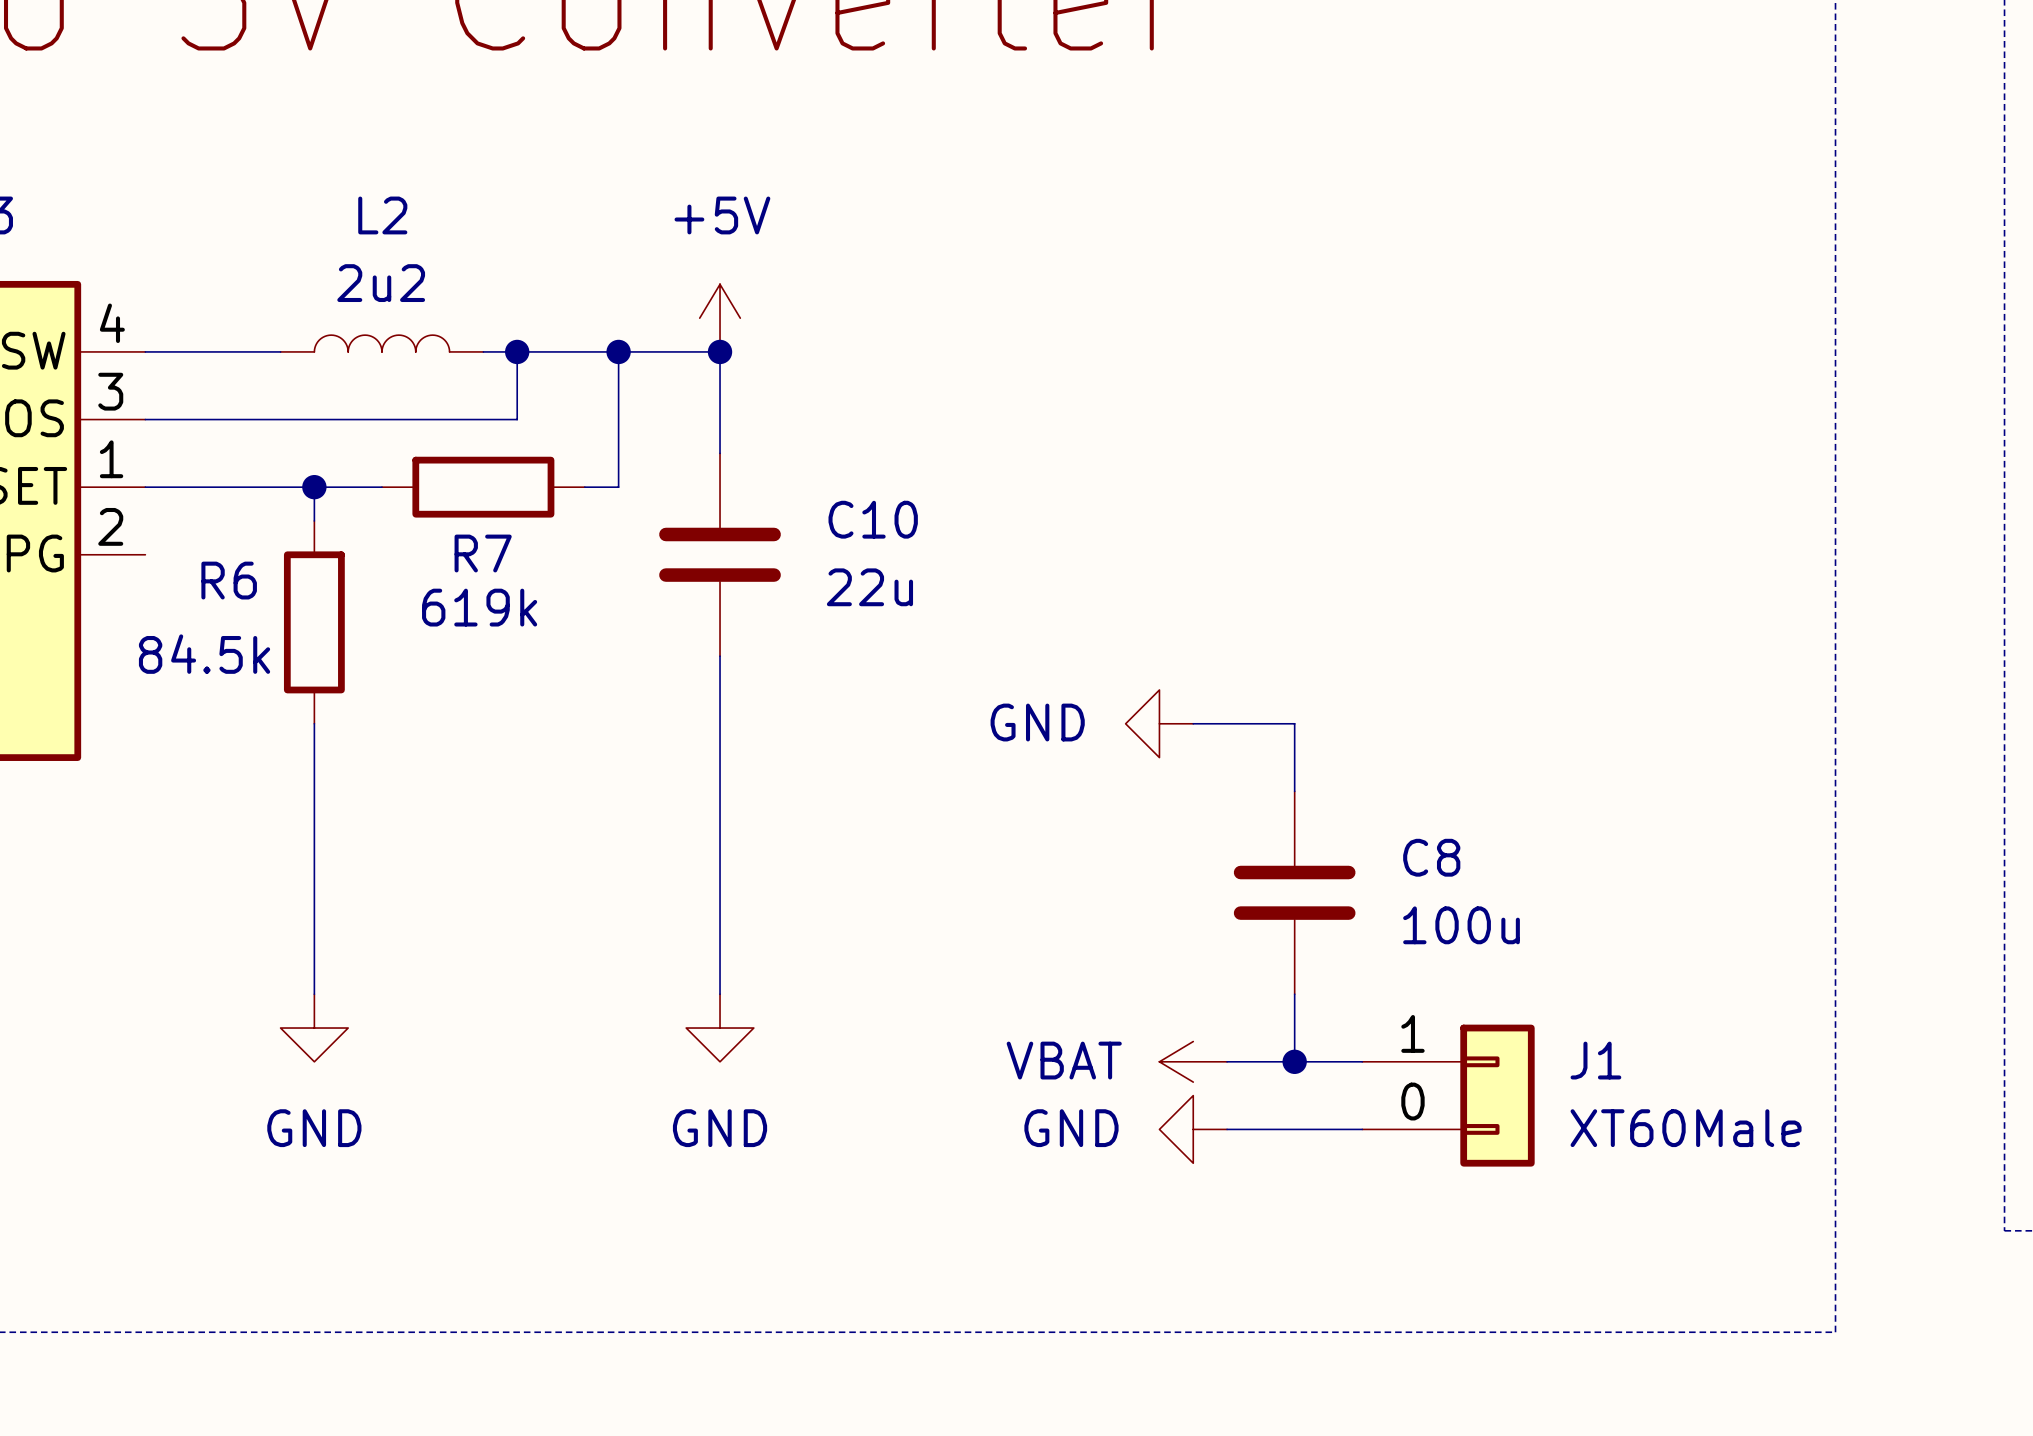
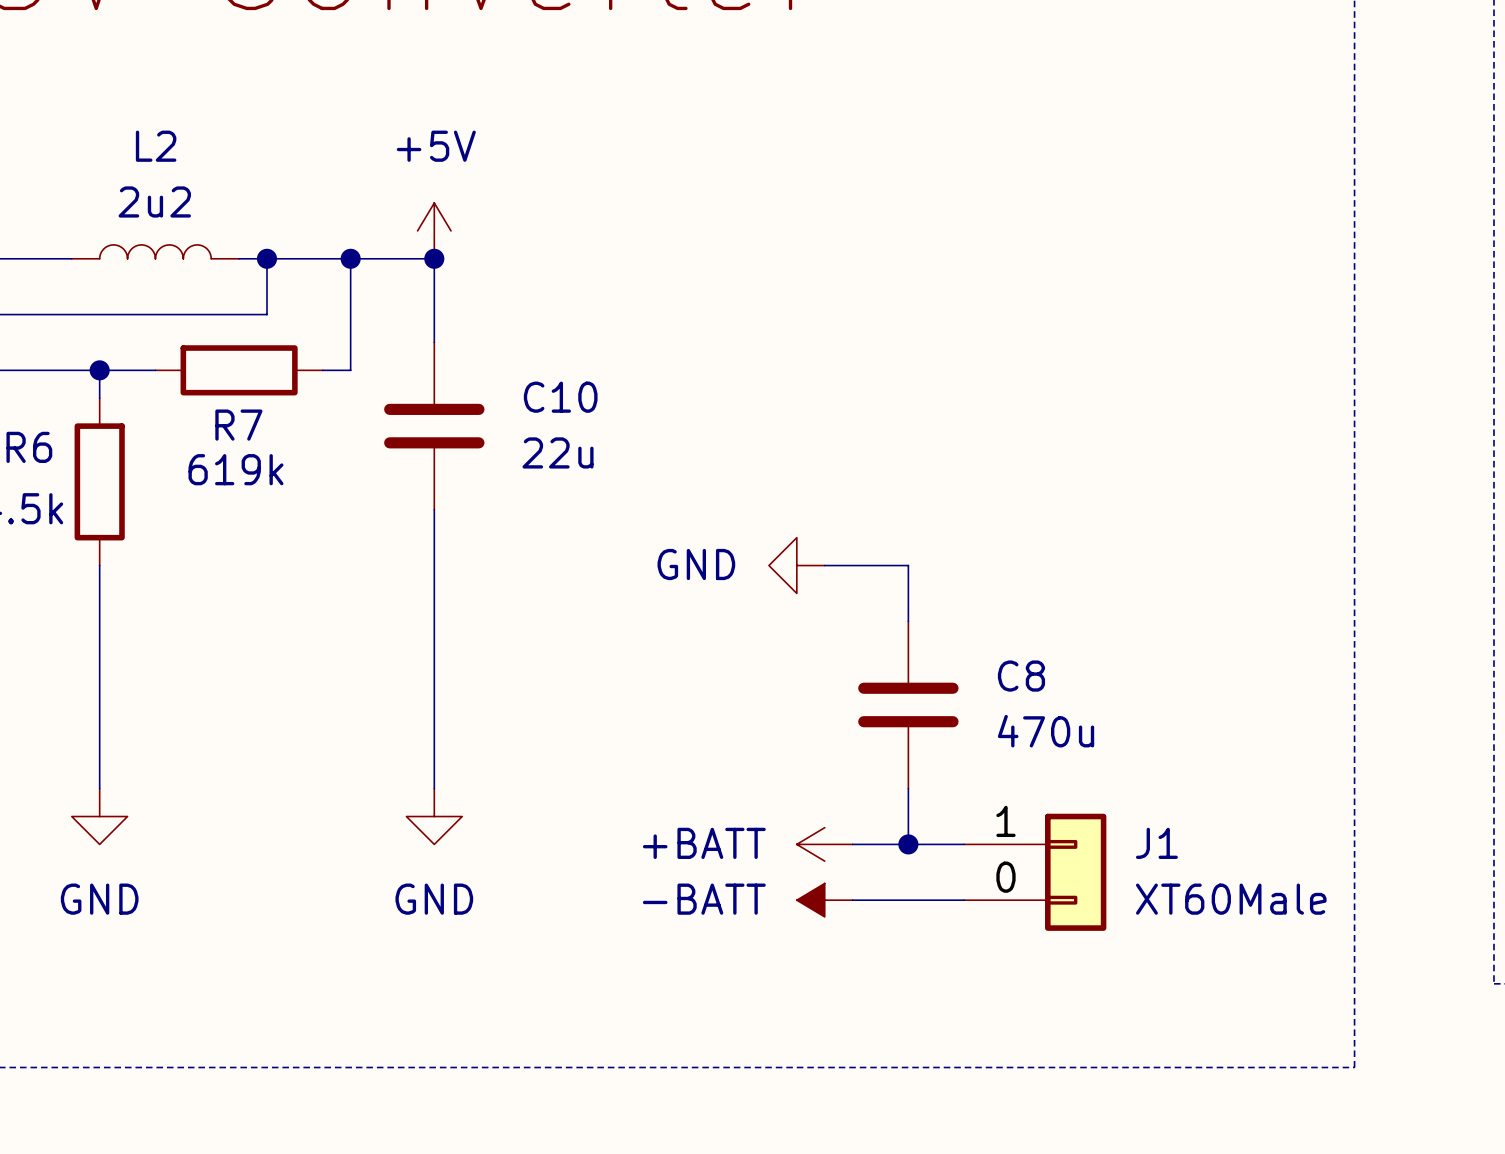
C8 value: 100u (1461, 925) -> 470u (1046, 731)
power symbol: VBAT (1193, 1061) -> +BATT (824, 844)
power symbol: GND (1193, 1129) -> -BATT (824, 900)

